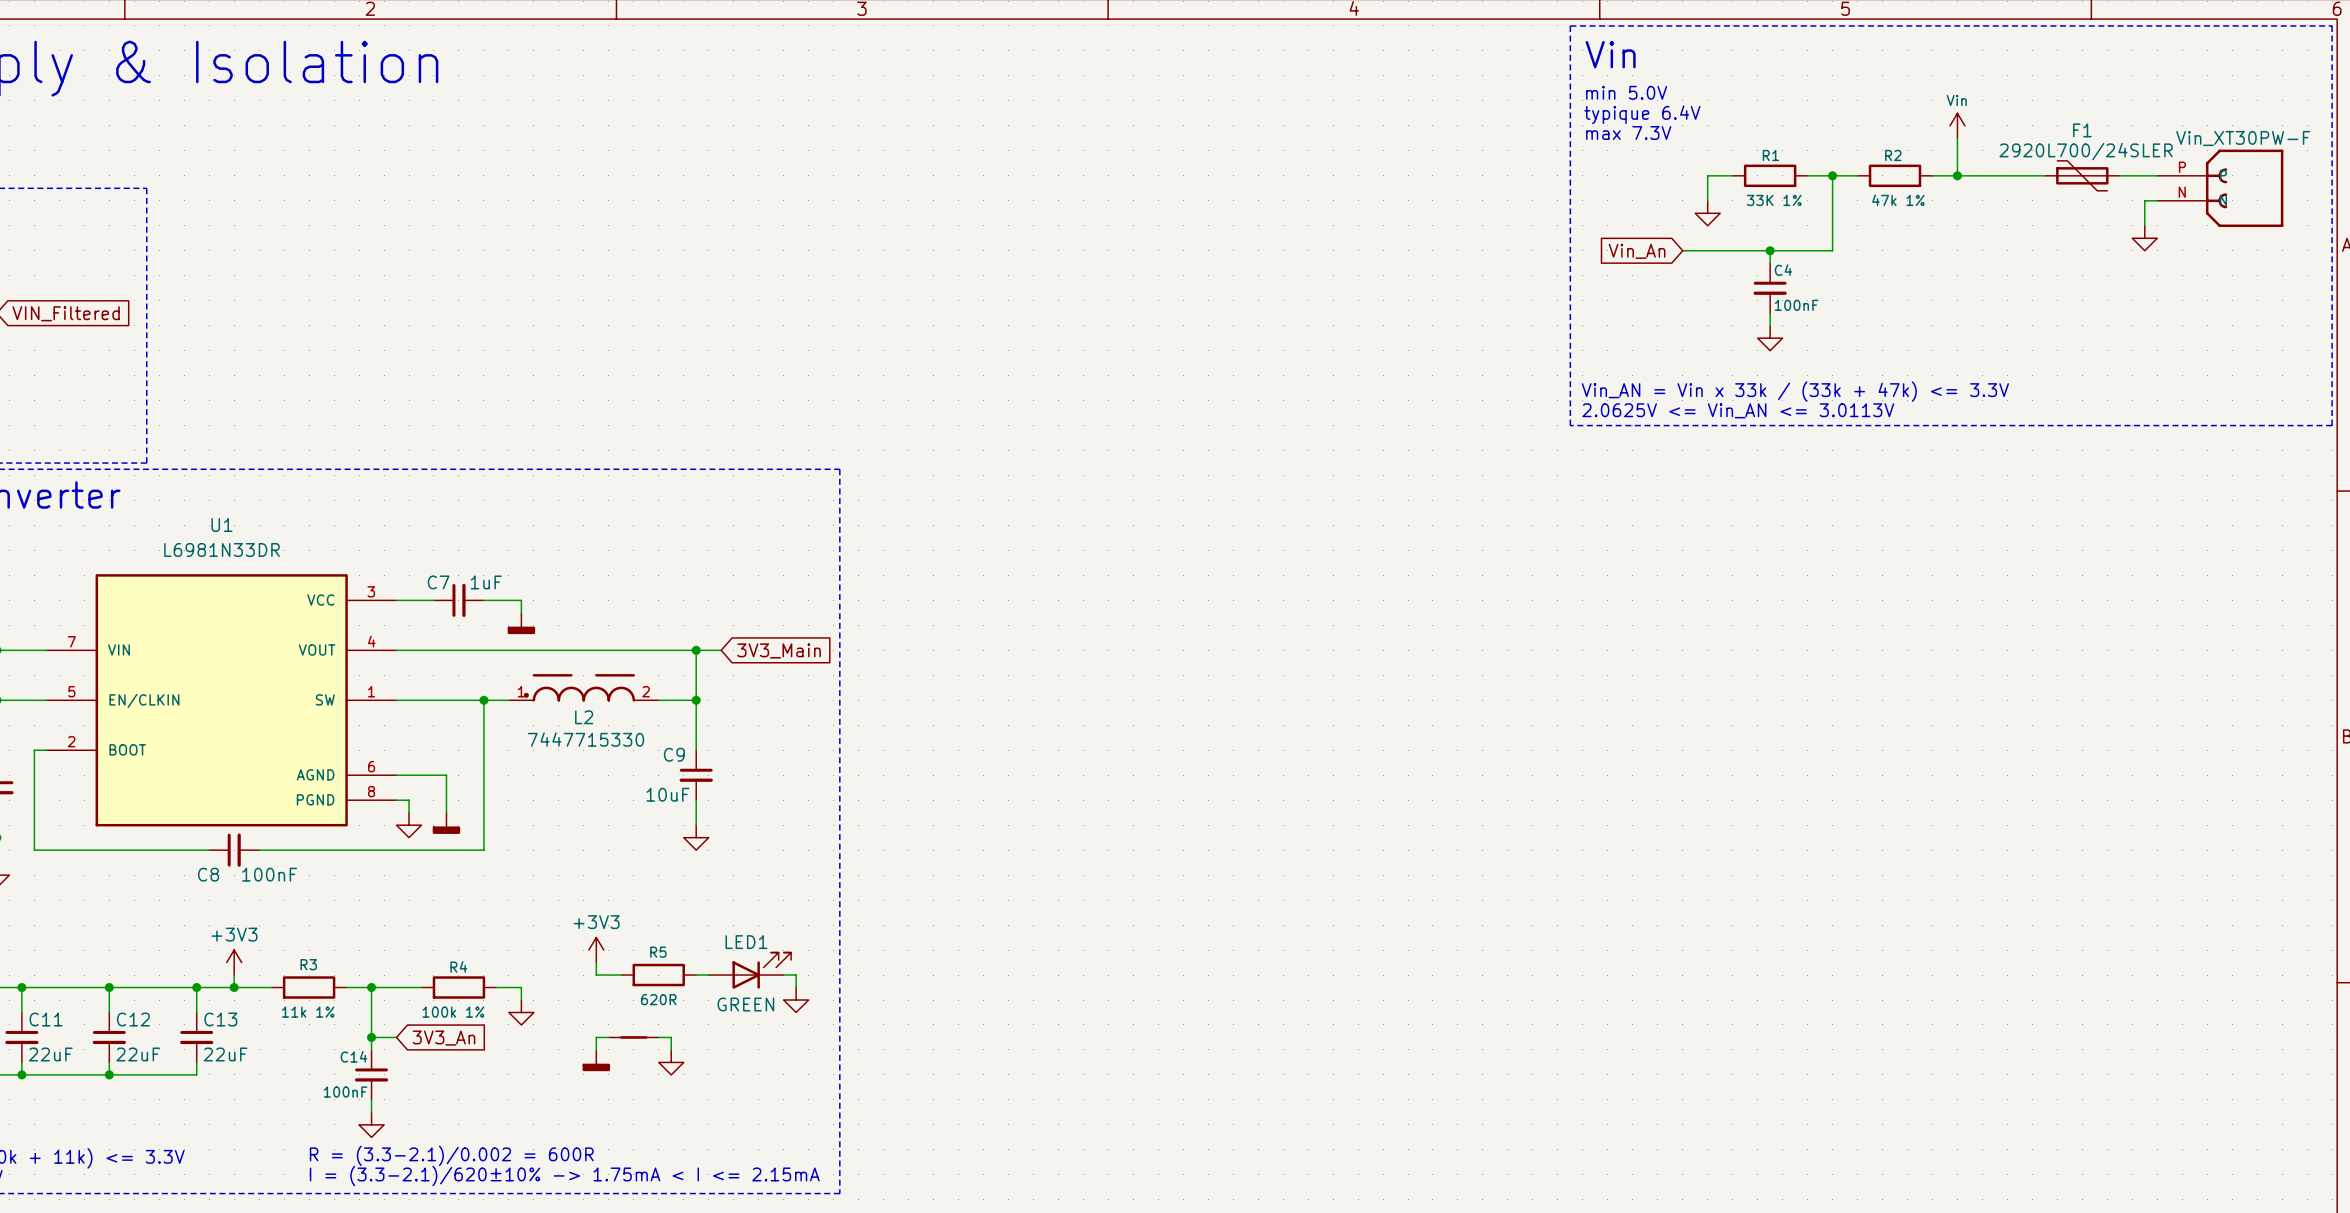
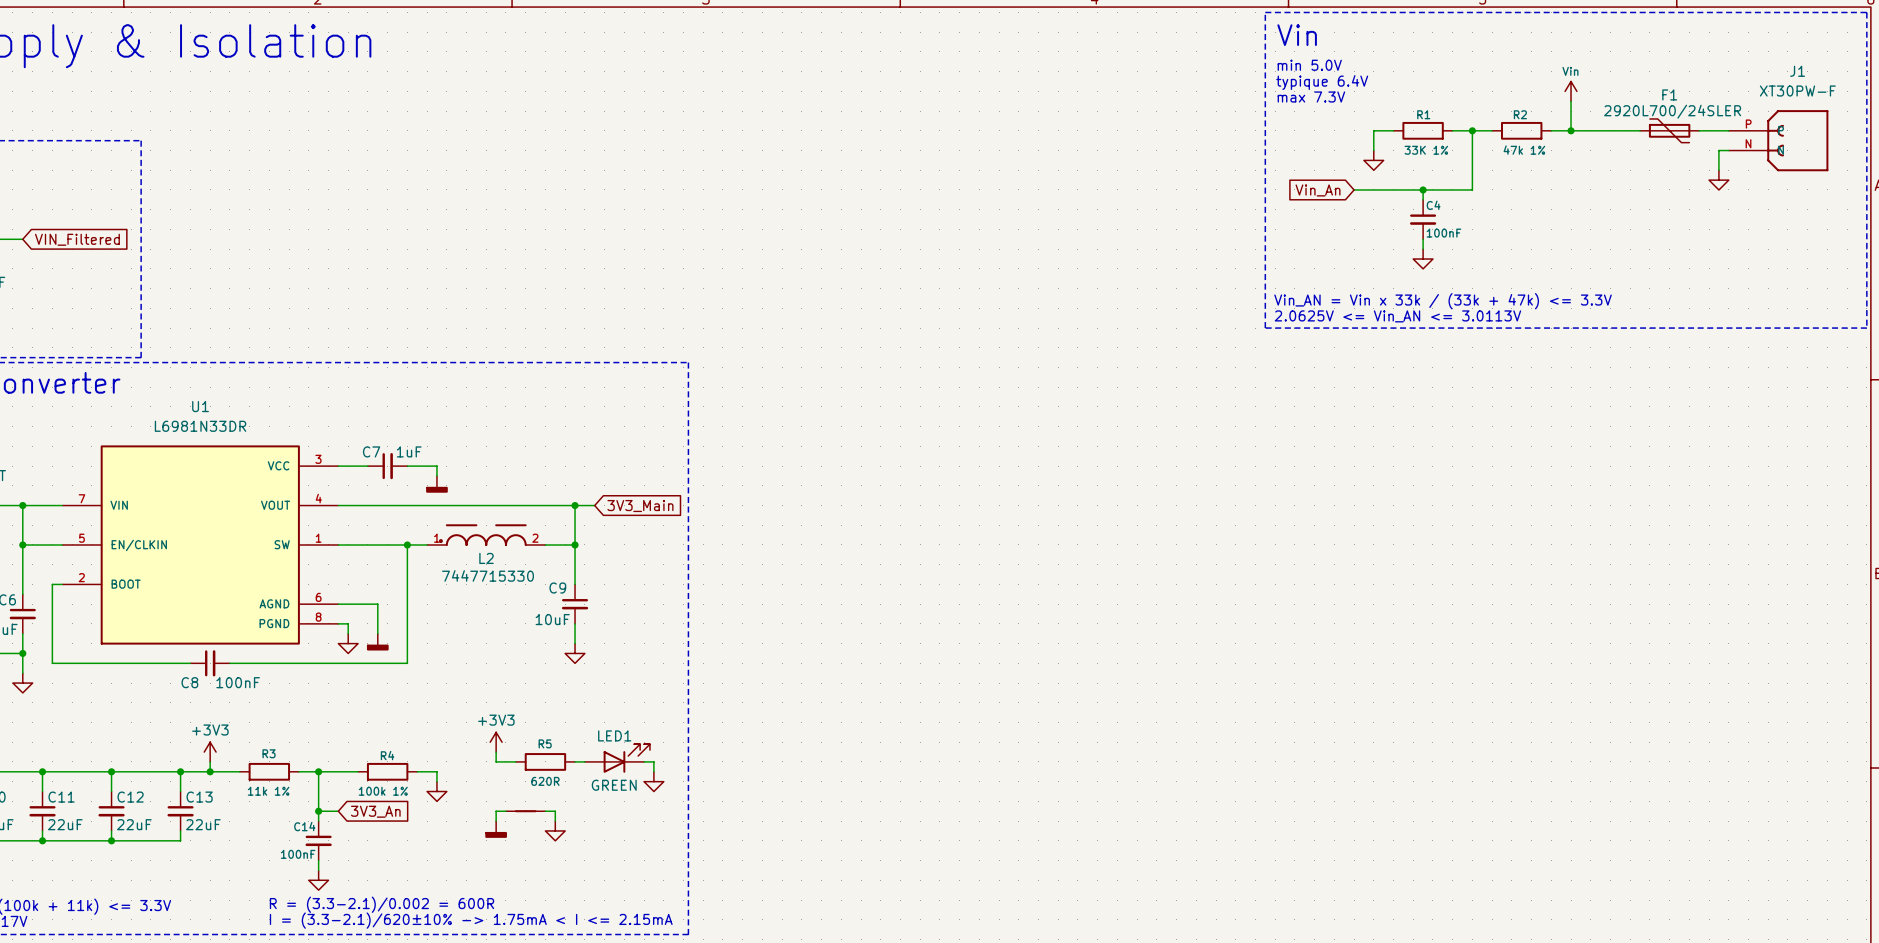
J1 name: none -> J1 (1797, 71)
J1 value: Vin_XT30PW-F (2243, 138) -> XT30PW-F (1797, 91)

